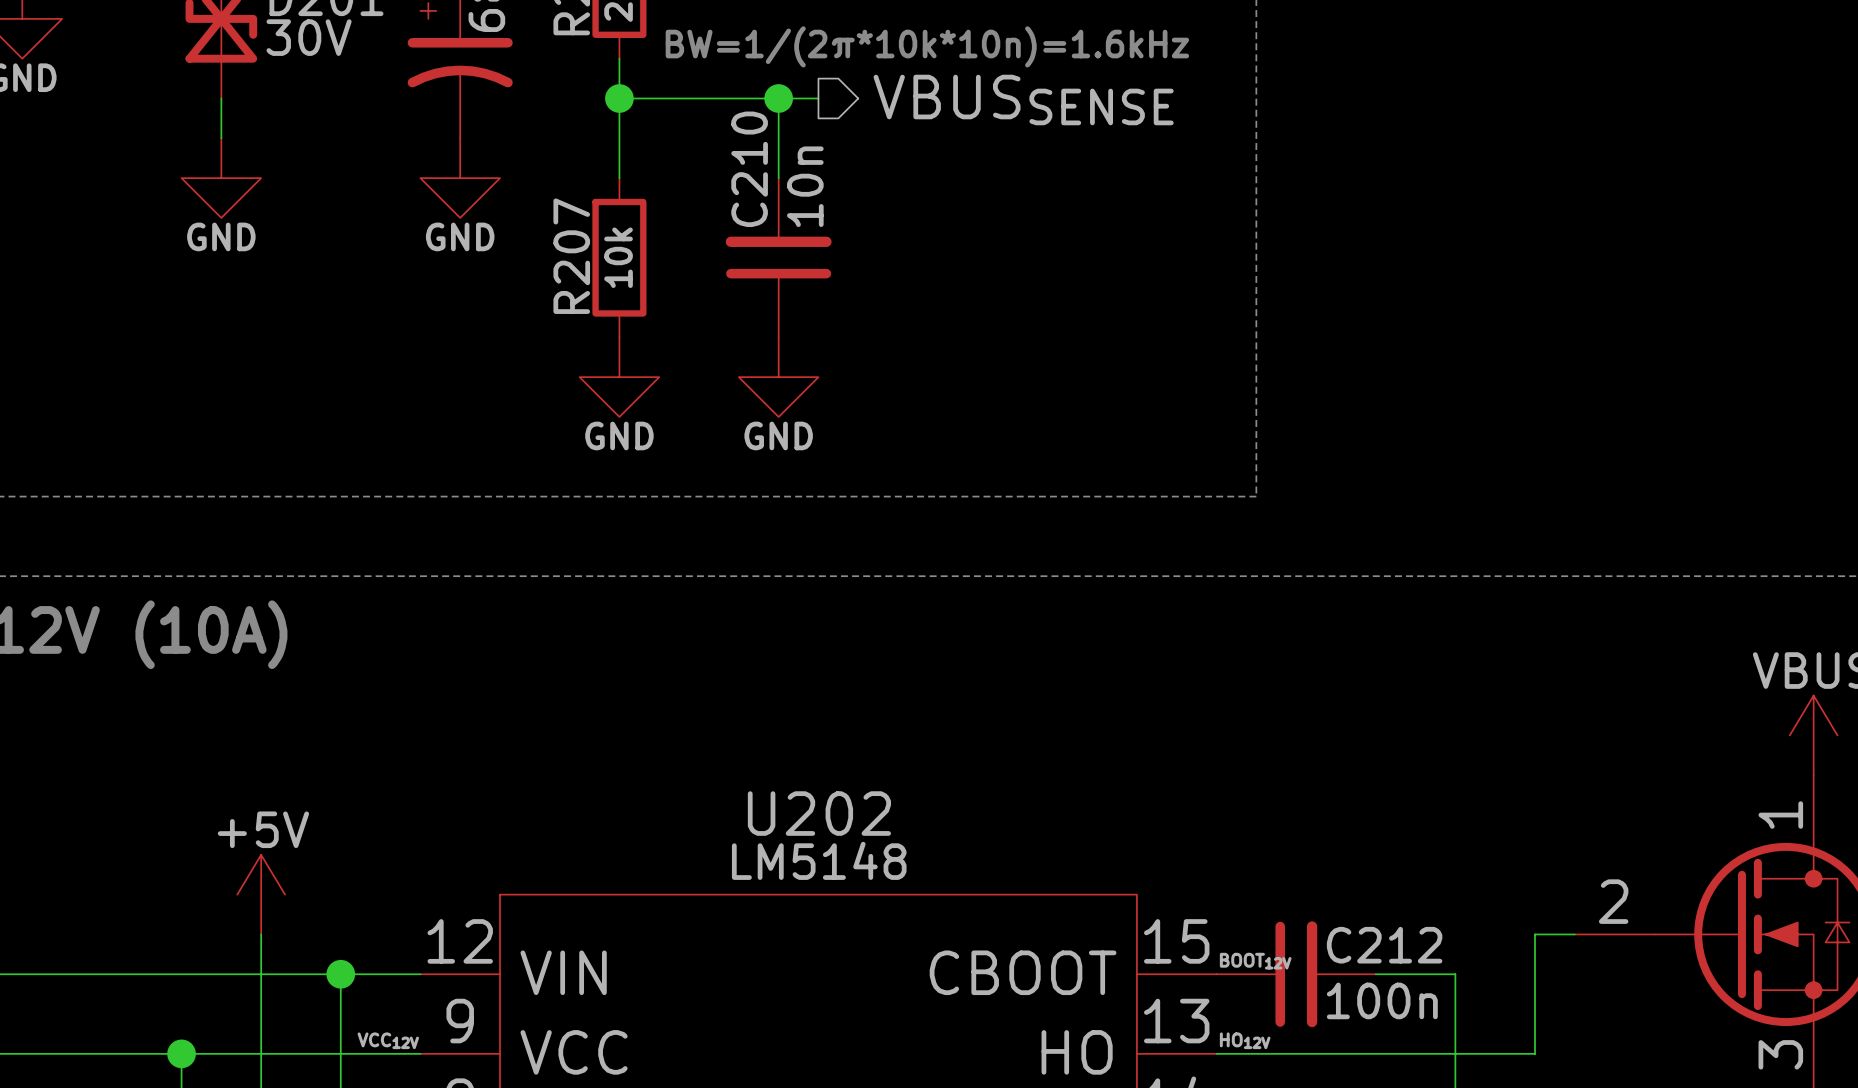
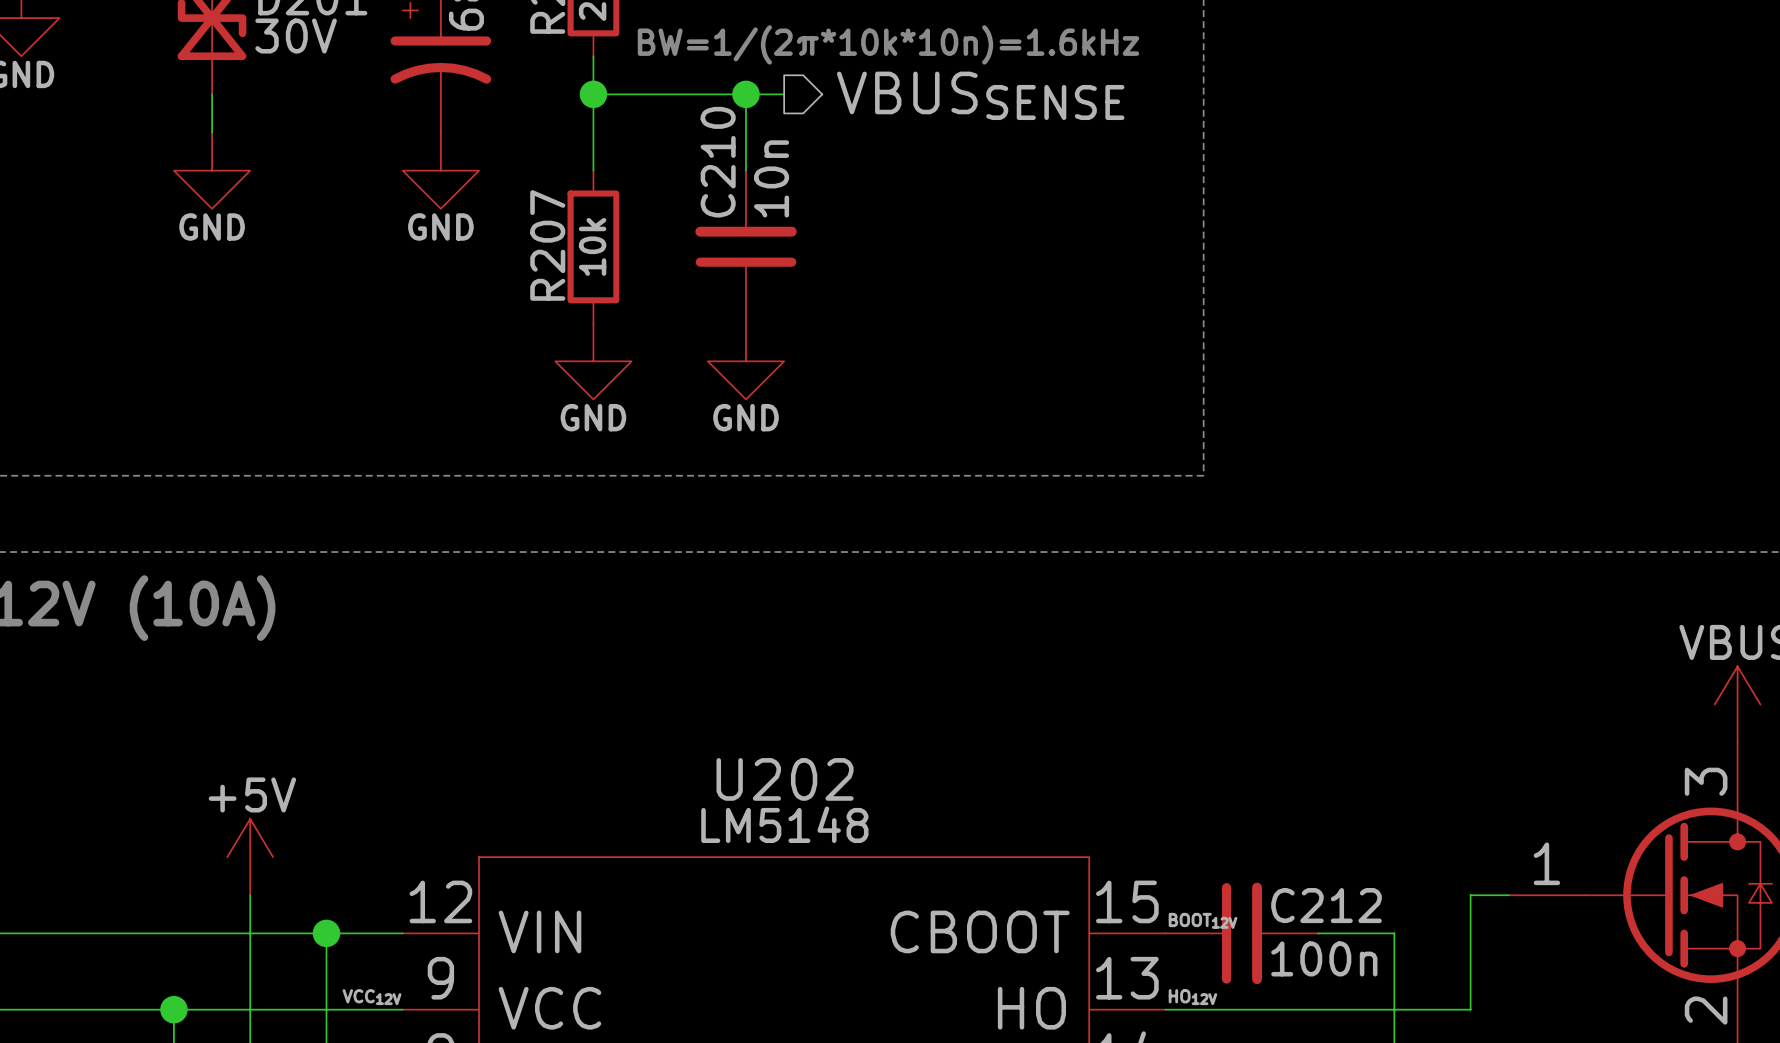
part pin number: 1 (1780, 815) -> 3 (1706, 781)
part pin number: 2 (1613, 901) -> 1 (1546, 863)
part pin number: 3 (1780, 1054) -> 2 (1706, 1010)

